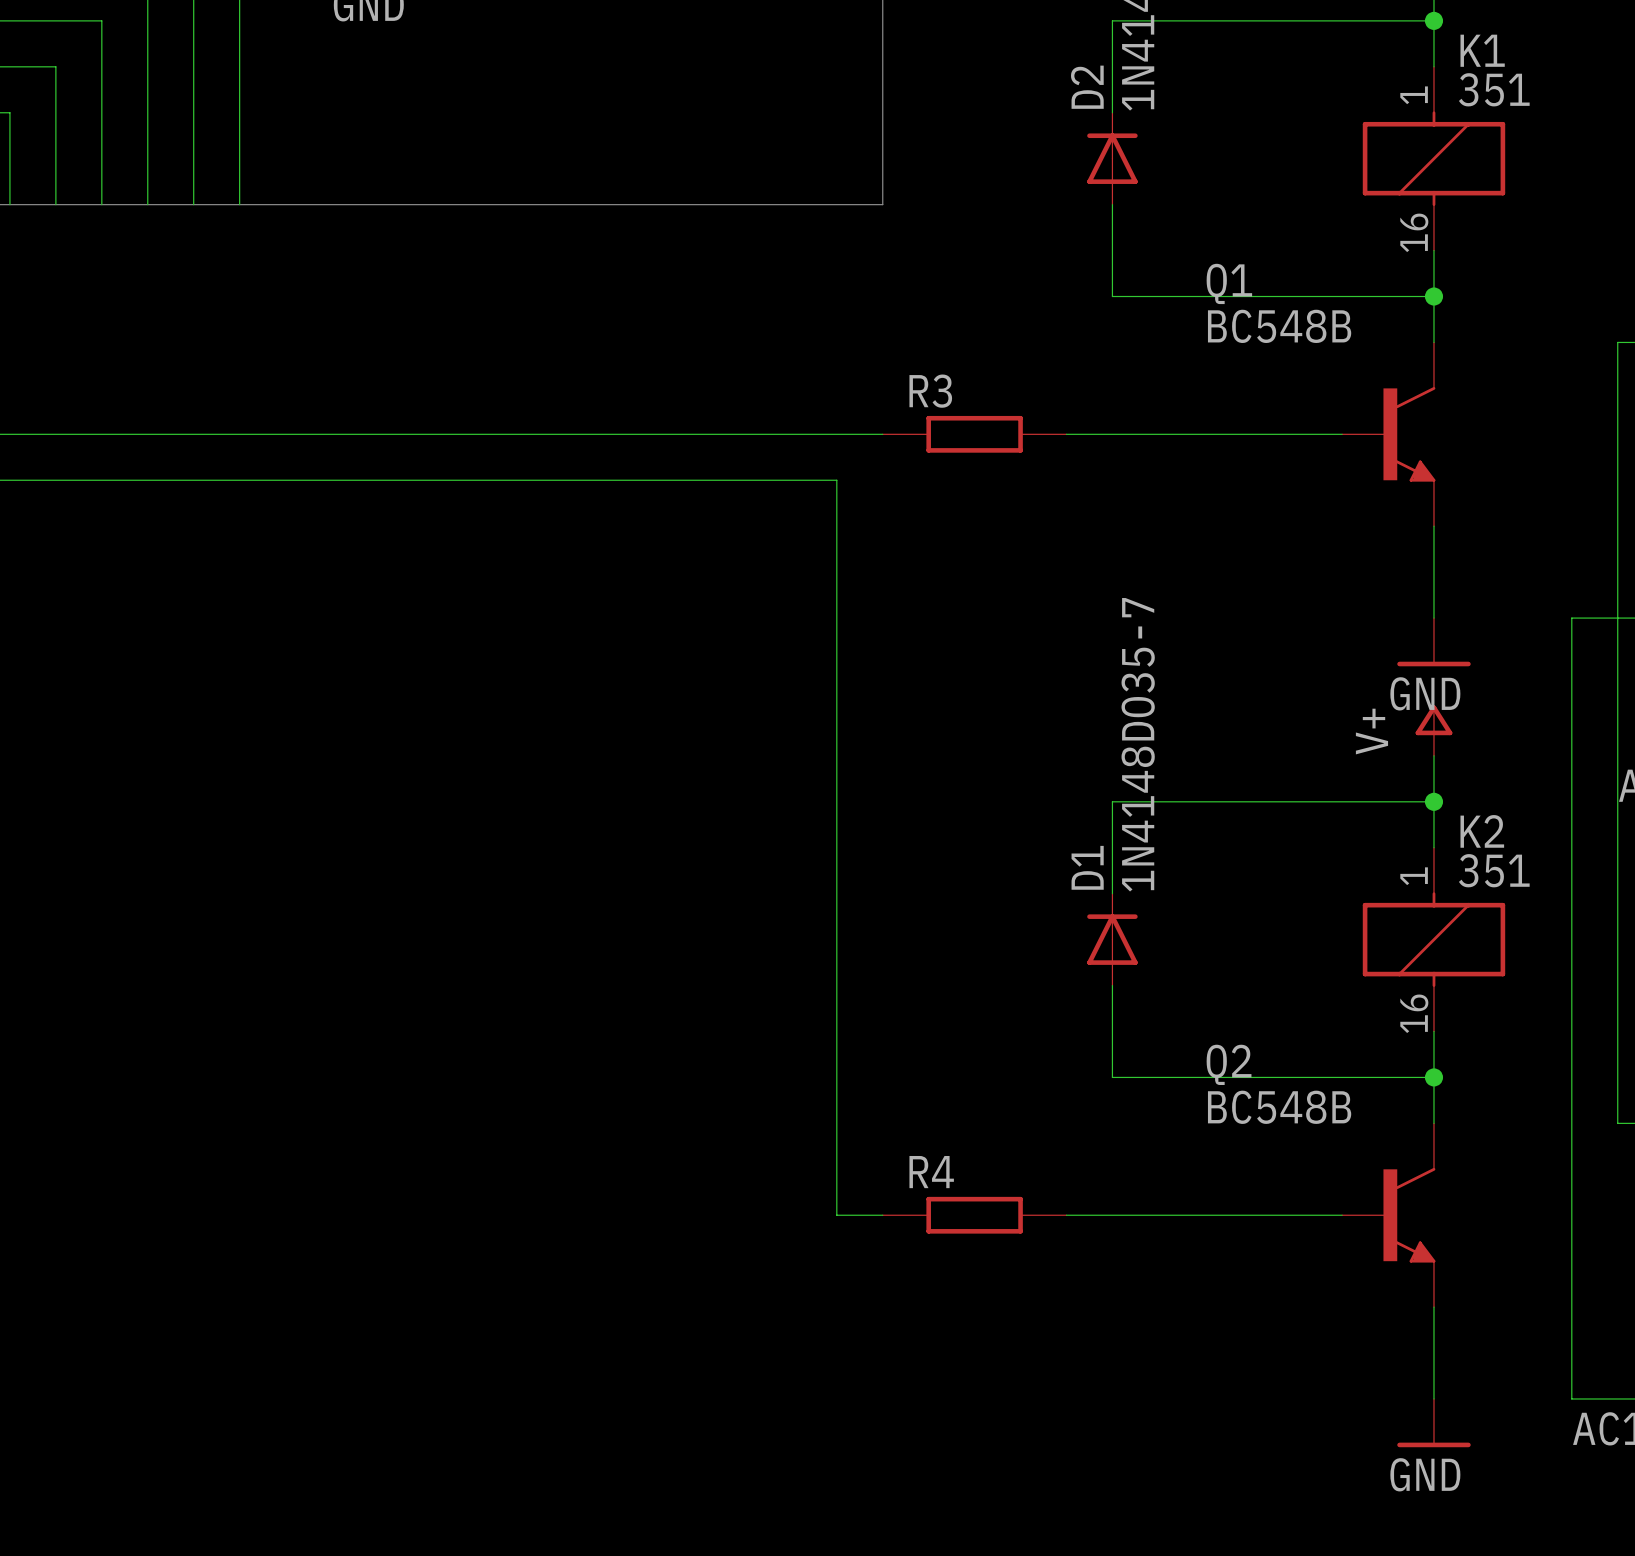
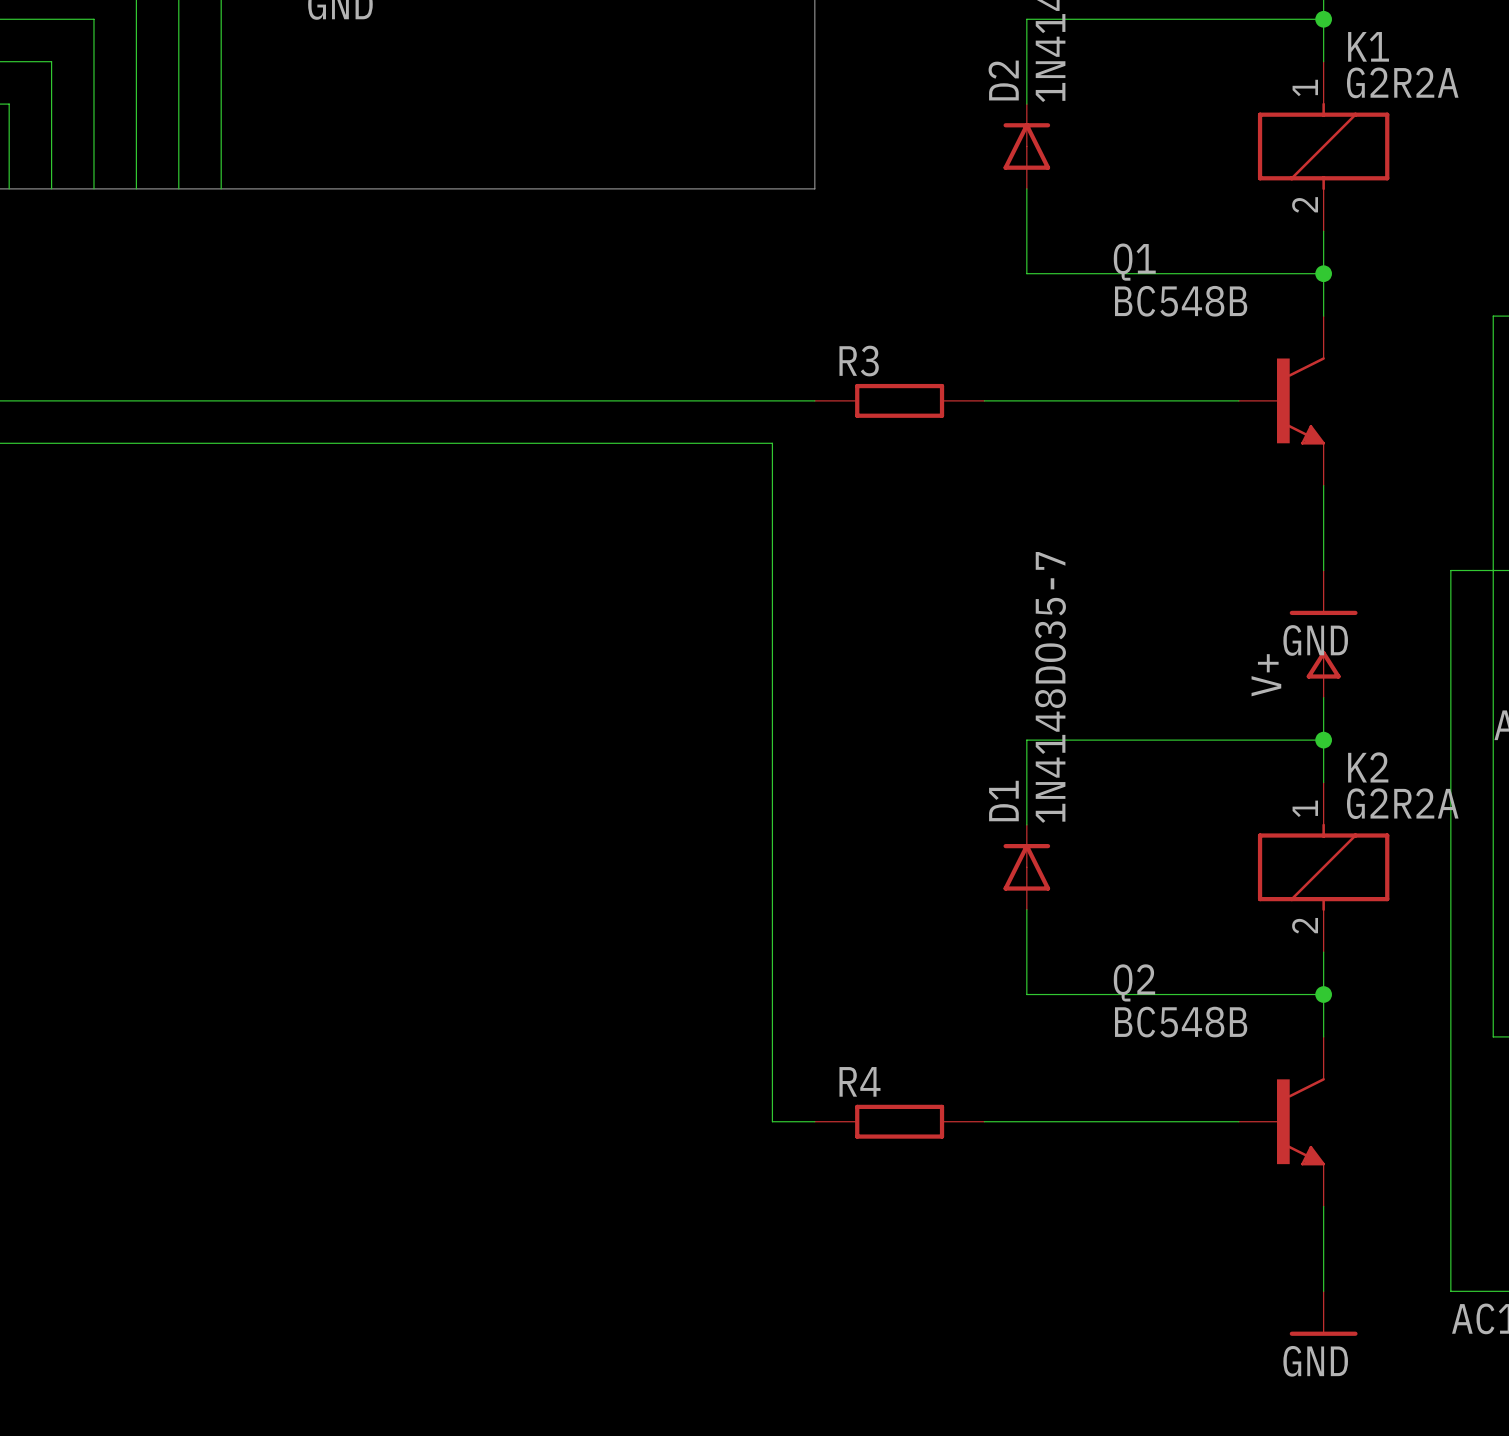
K1 value: 351 (1494, 89) -> G2R2A (1402, 82)
K1 pin number: 16 (1414, 232) -> 2 (1305, 204)
K2 value: 351 (1494, 870) -> G2R2A (1402, 803)
K2 pin number: 16 (1414, 1013) -> 2 (1305, 925)

